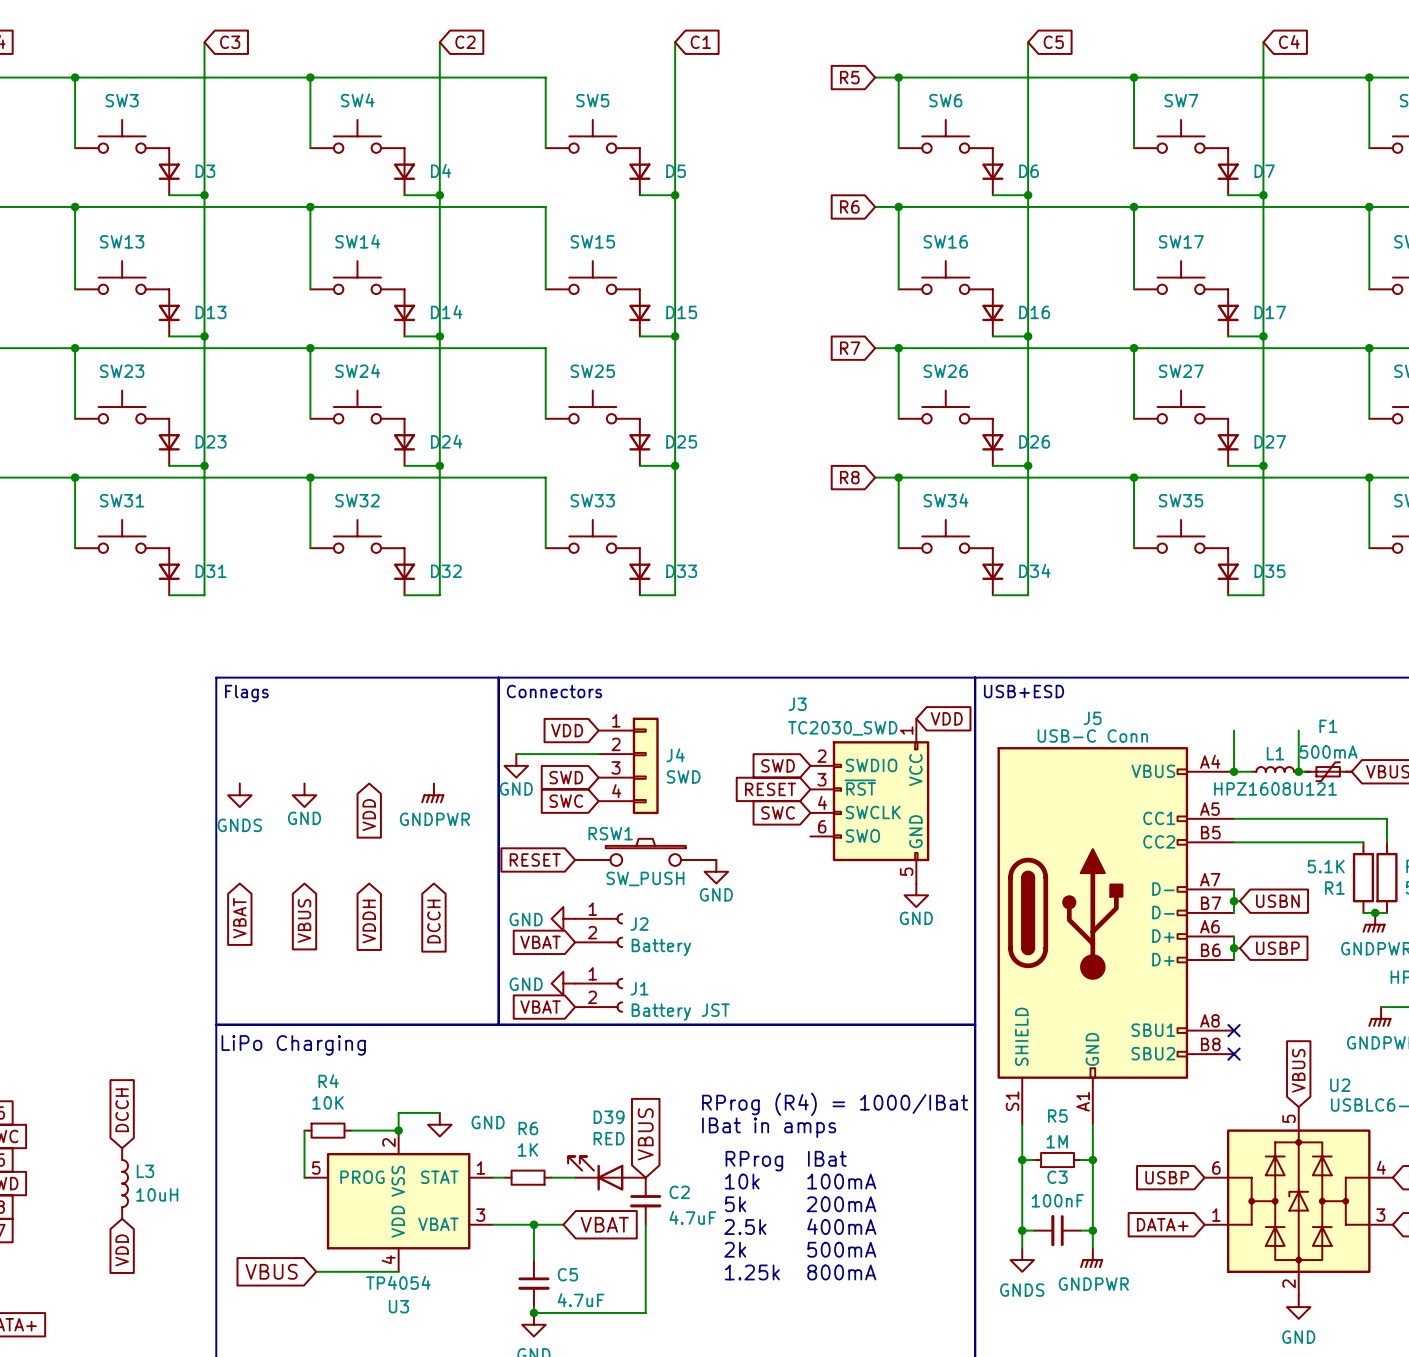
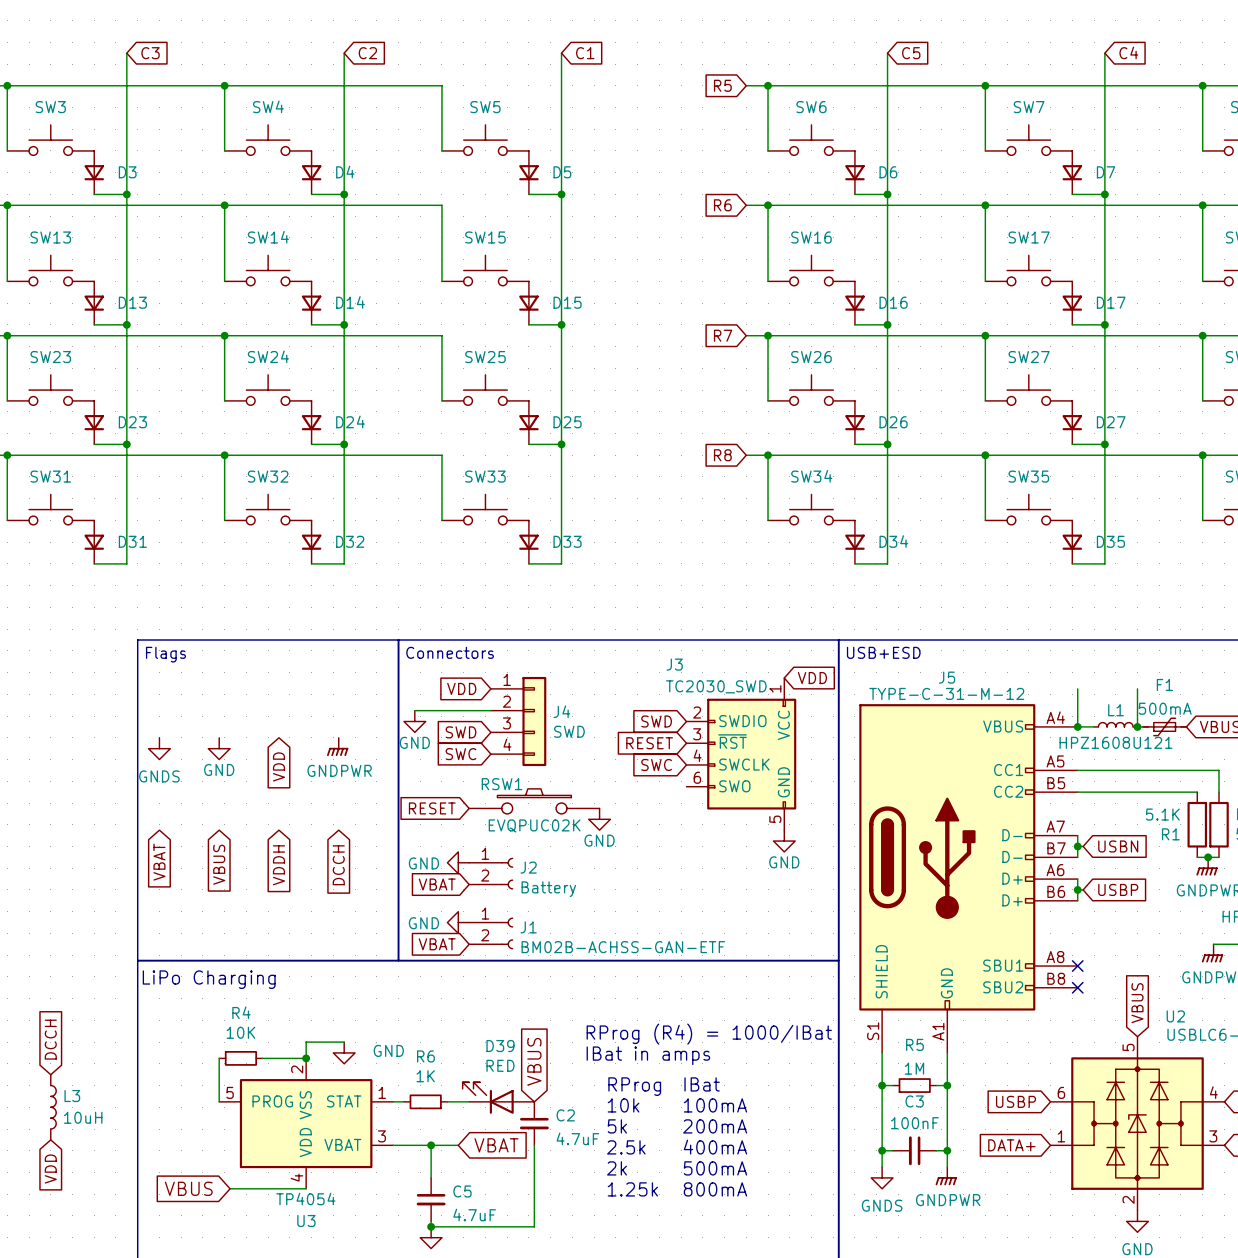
J5 value: USB-C Conn (1092, 736) -> TYPE-C-31-M-12 (946, 693)
RSW1 value: SW_PUSH (645, 878) -> EVQPUC02K (534, 825)
J1 value: Battery JST (680, 1012) -> BM02B-ACHSS-GAN-ETF (623, 947)

